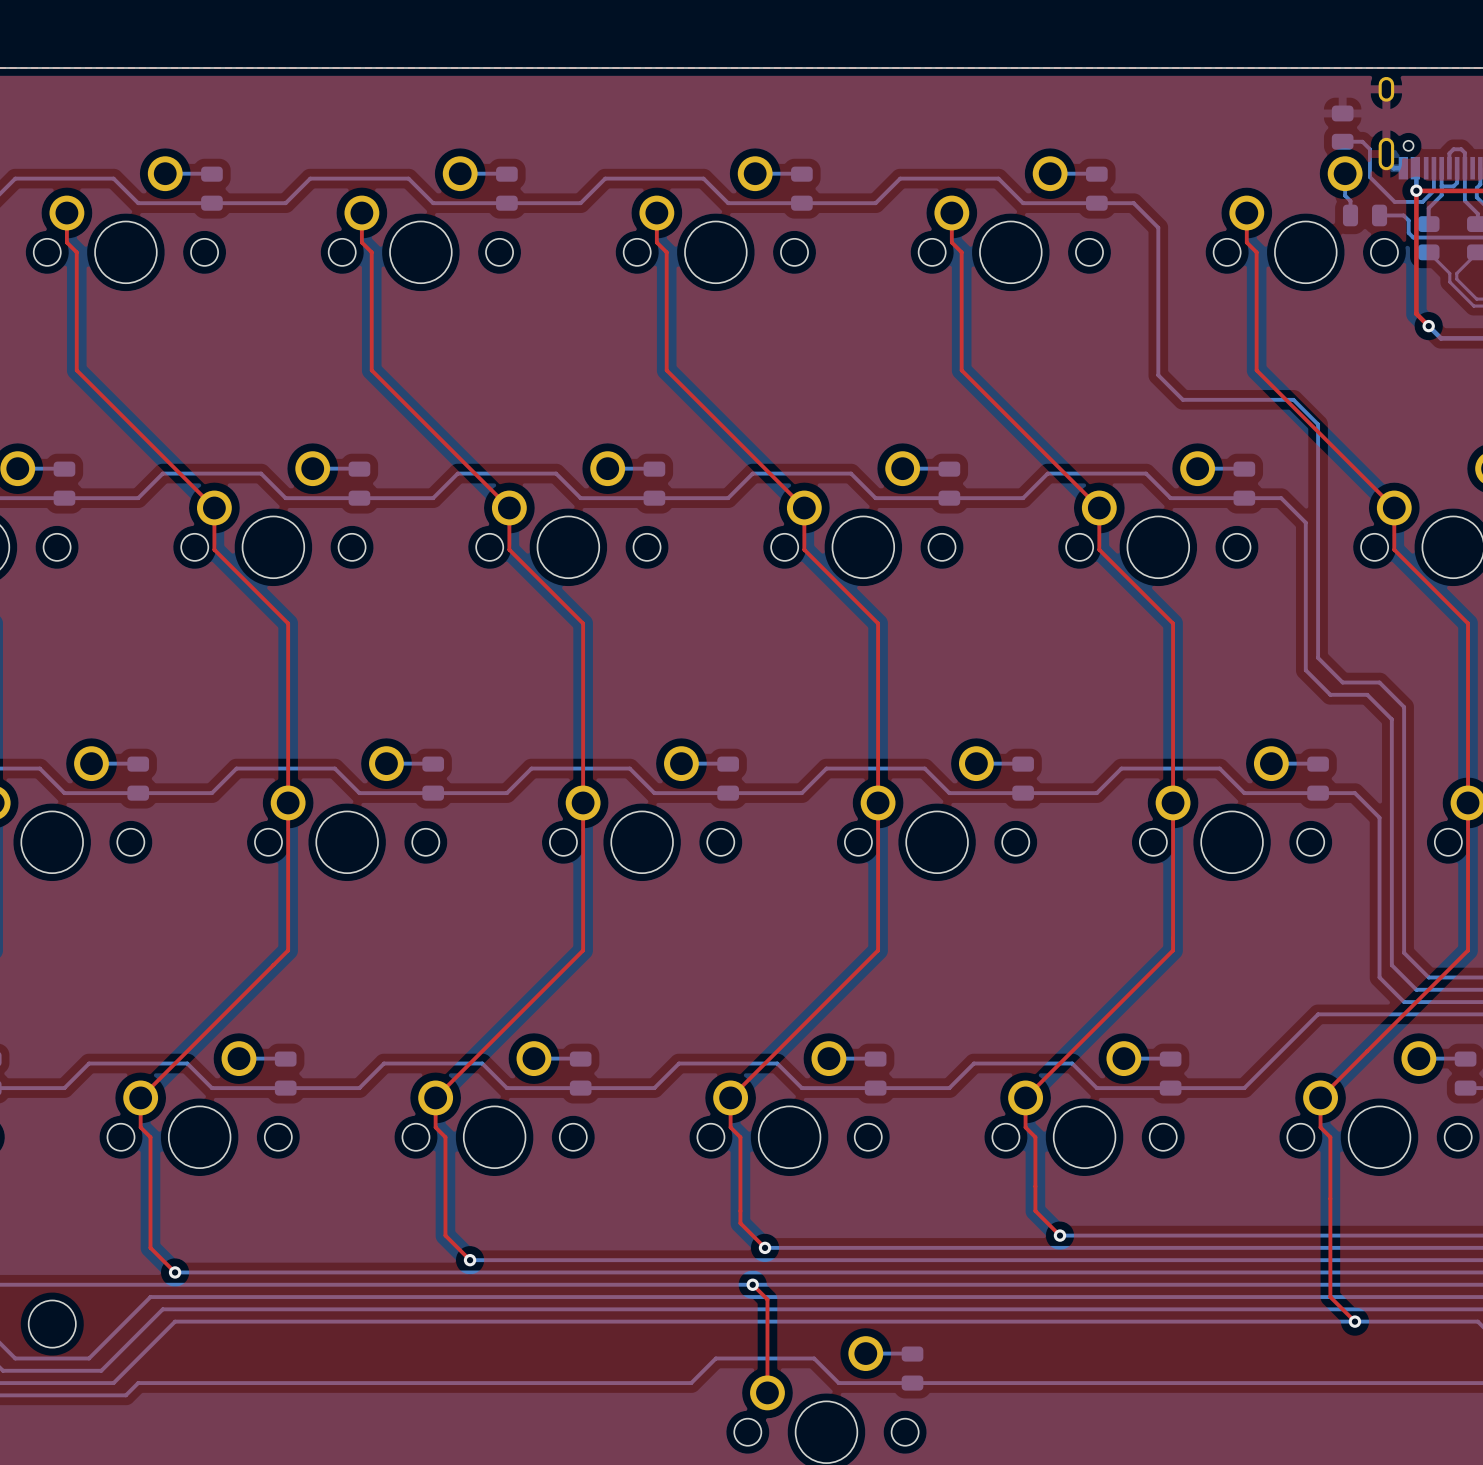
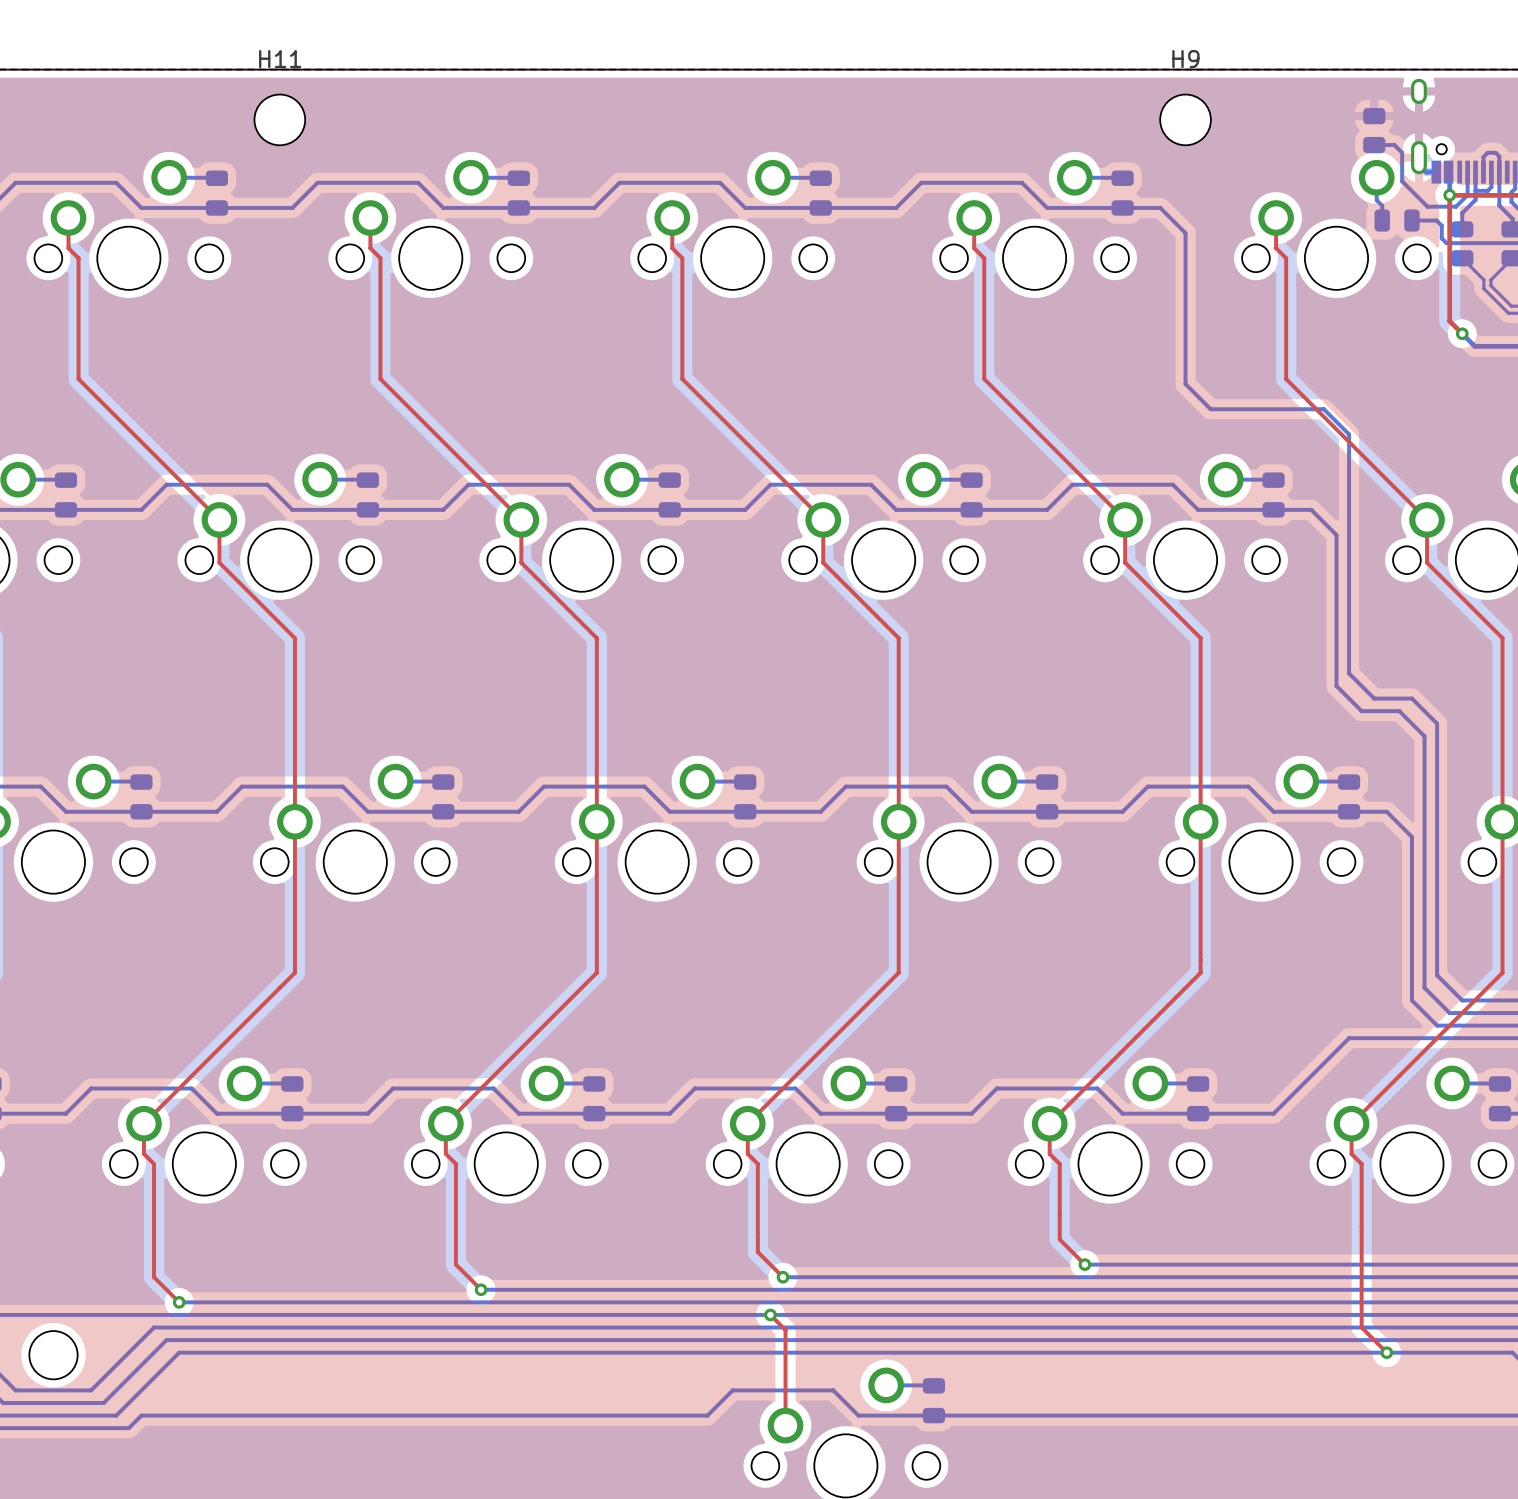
H11: none -> (279, 119)
H9: none -> (1185, 119)

